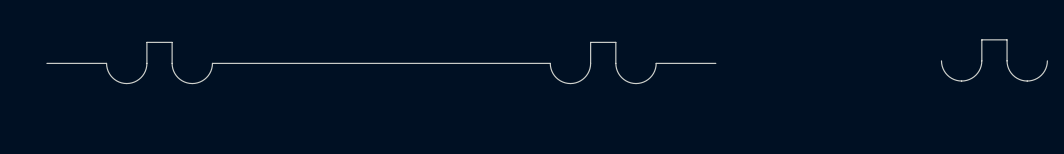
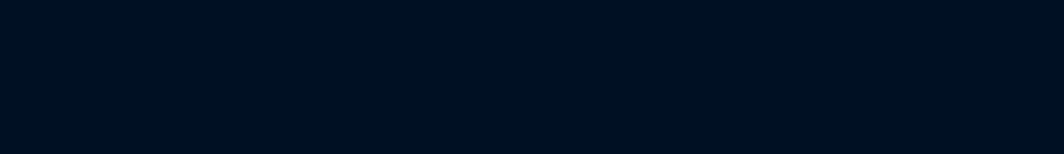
board edge: (941, 60) (944, 70) (951, 78) (961, 81) (971, 78) (977, 73) (981, 66) (981, 39) (1007, 39) (1008, 68) (1012, 75) (1021, 80) (1029, 80) (1039, 76) (1045, 68) (1047, 60) -> none
board edge: (46, 63) (106, 63) (109, 73) (114, 79) (124, 83) (131, 82) (139, 79) (145, 71) (146, 42) (172, 42) (173, 71) (182, 80) (192, 83) (200, 82) (206, 77) (210, 71) (212, 63) (550, 63) (551, 71) (558, 79) (565, 82) (573, 83) (582, 79) (589, 71) (590, 42) (615, 42) (617, 71) (623, 79) (633, 83) (641, 82) (648, 79) (654, 71) (656, 63) (715, 63) -> none

